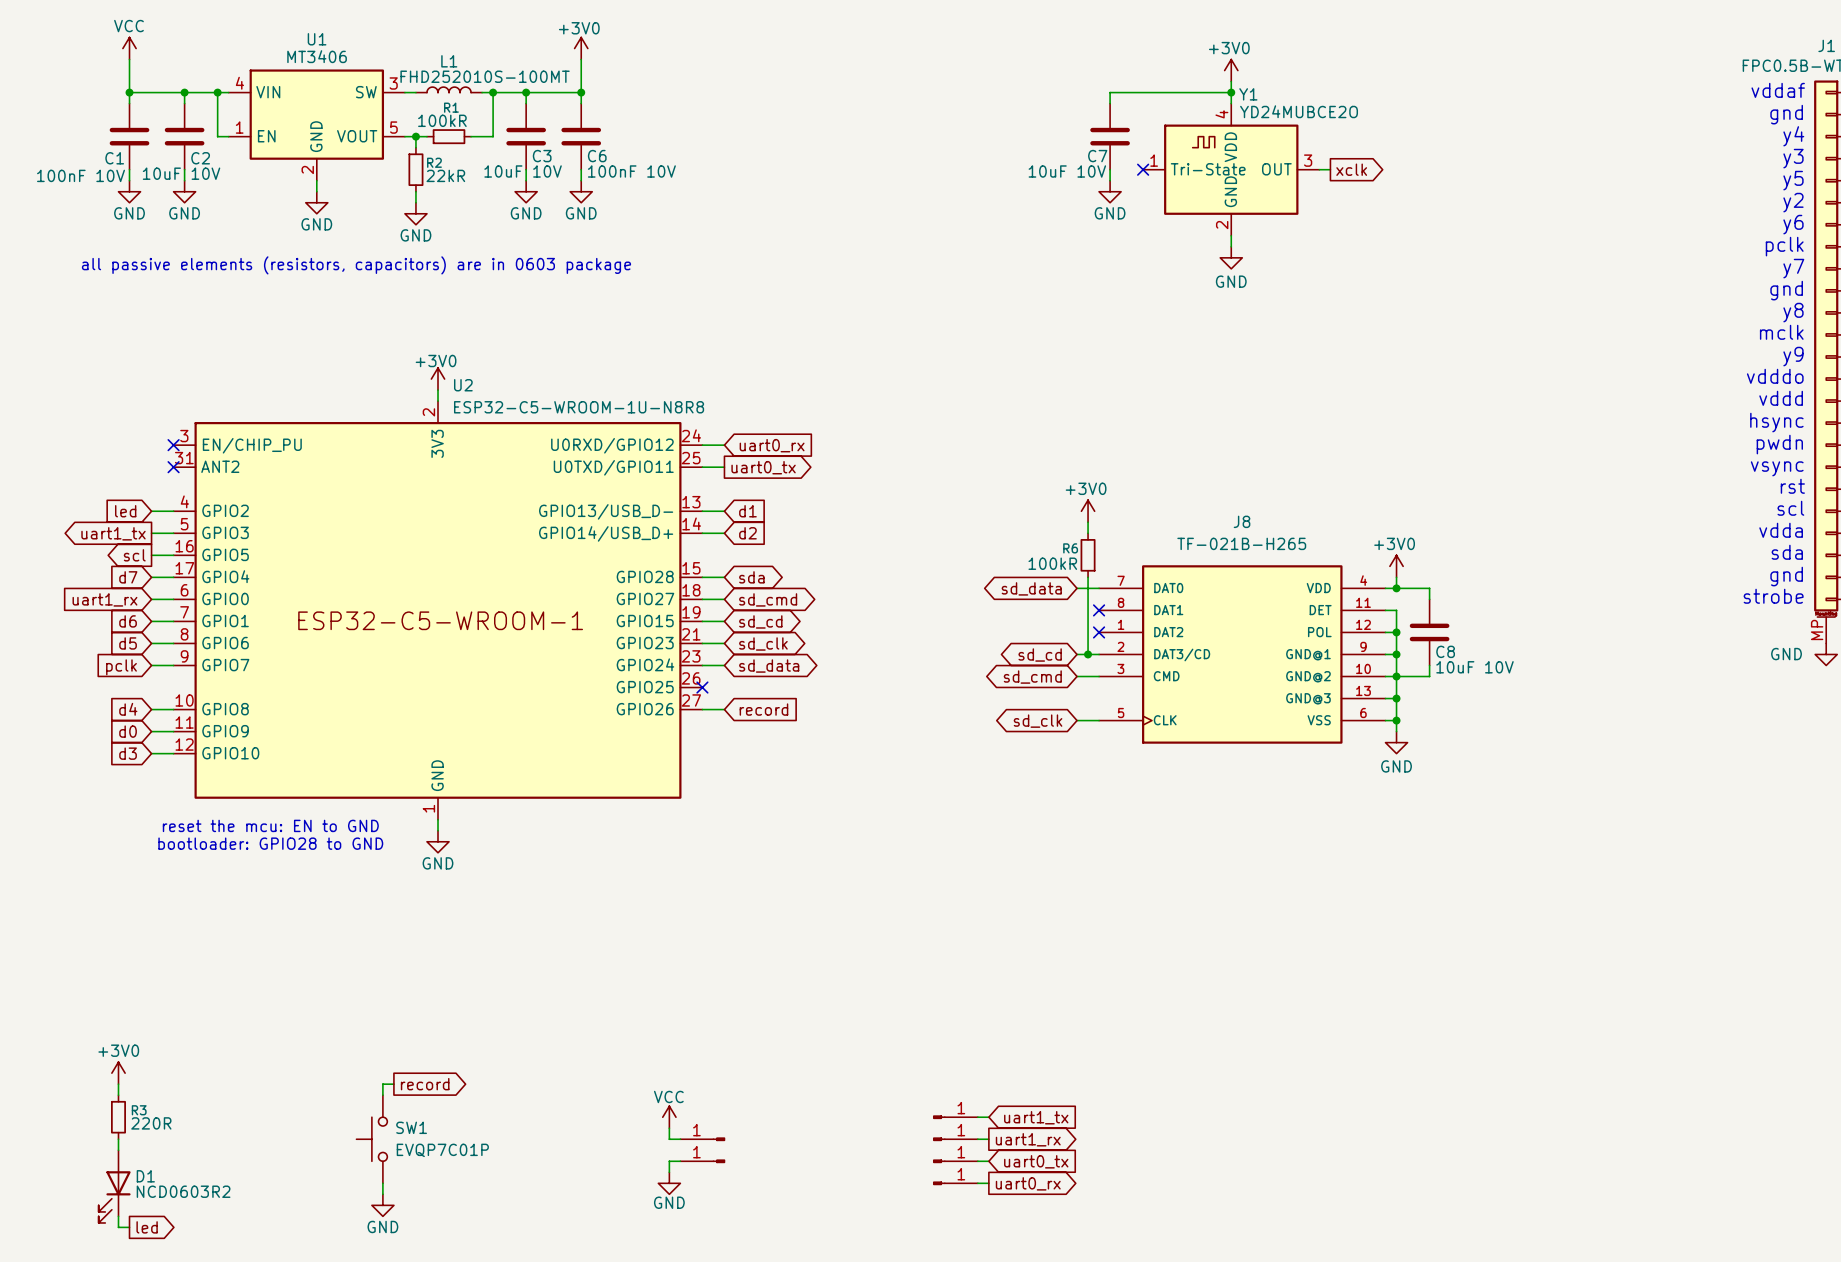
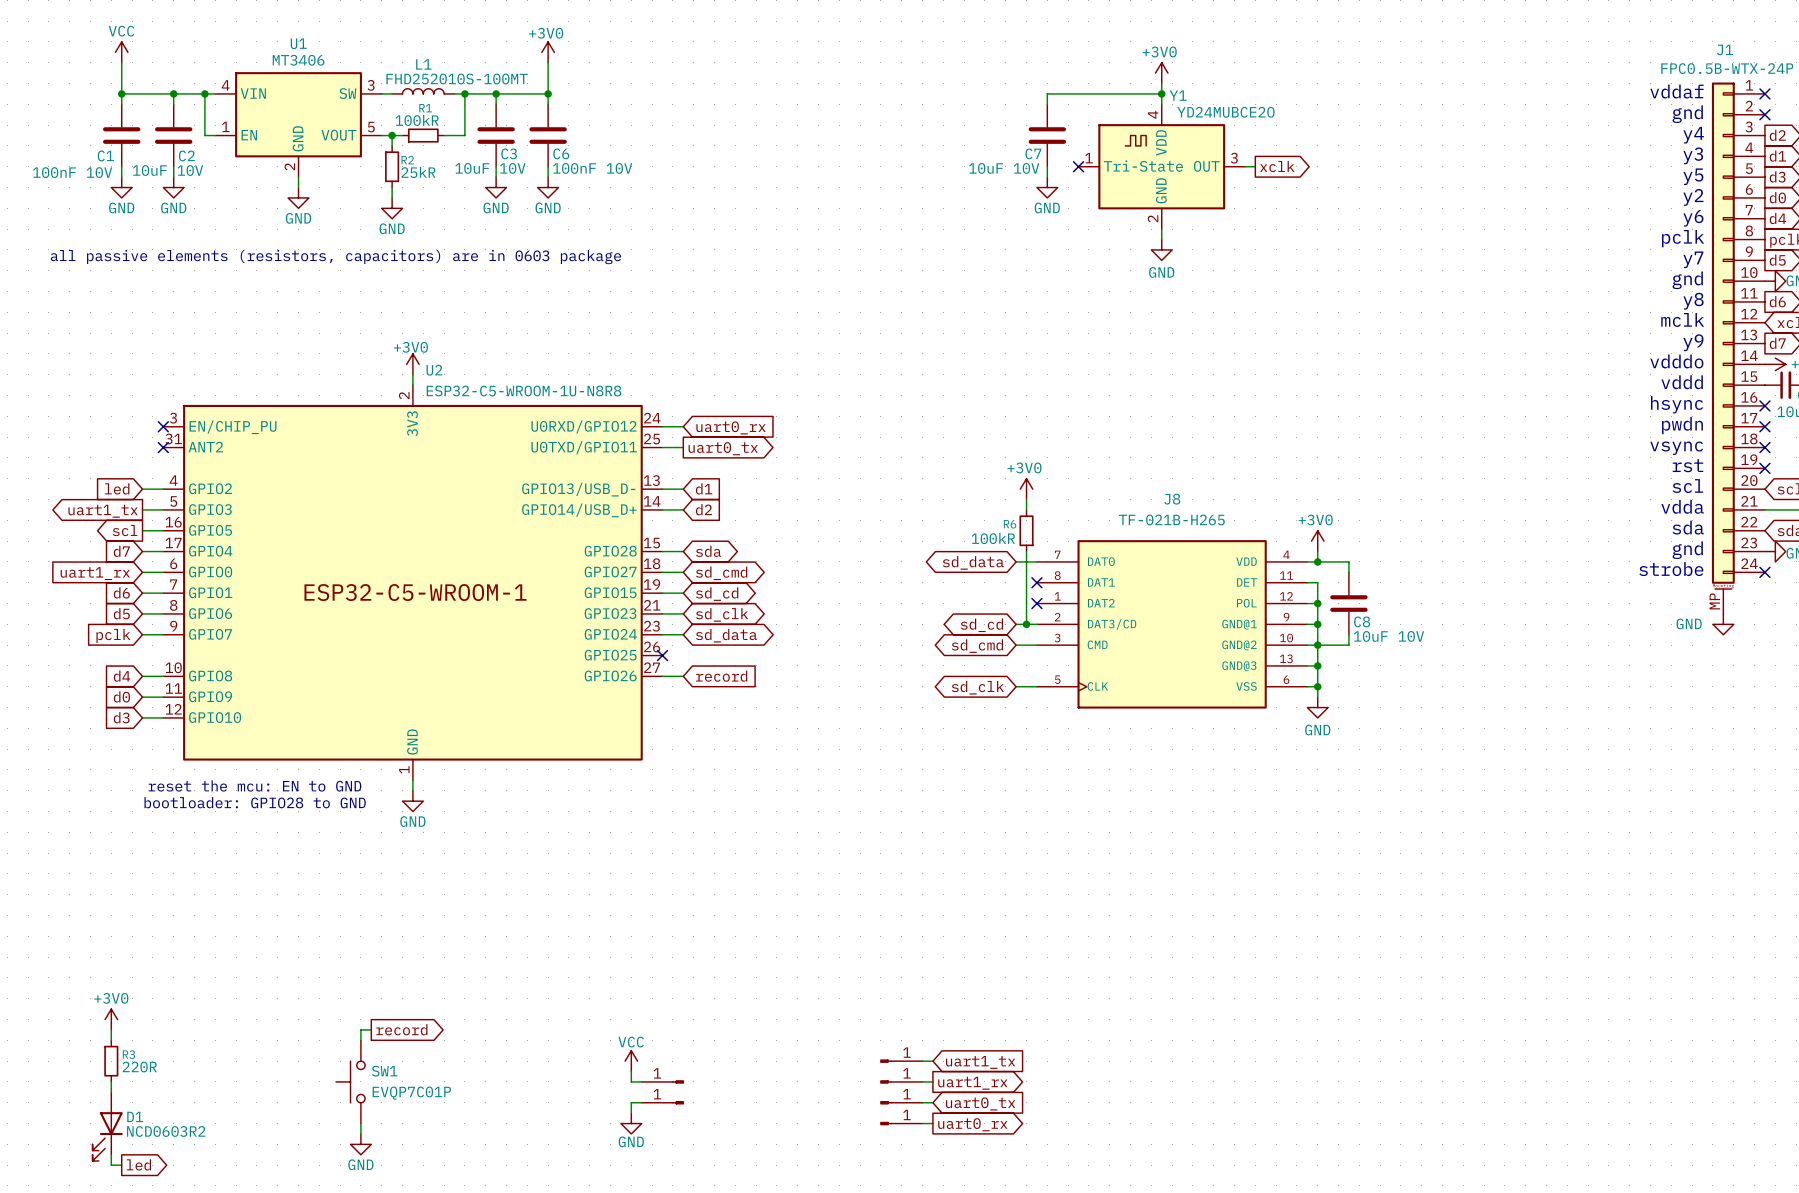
R2 value: 22kR (445, 175) -> 25kR (418, 172)

